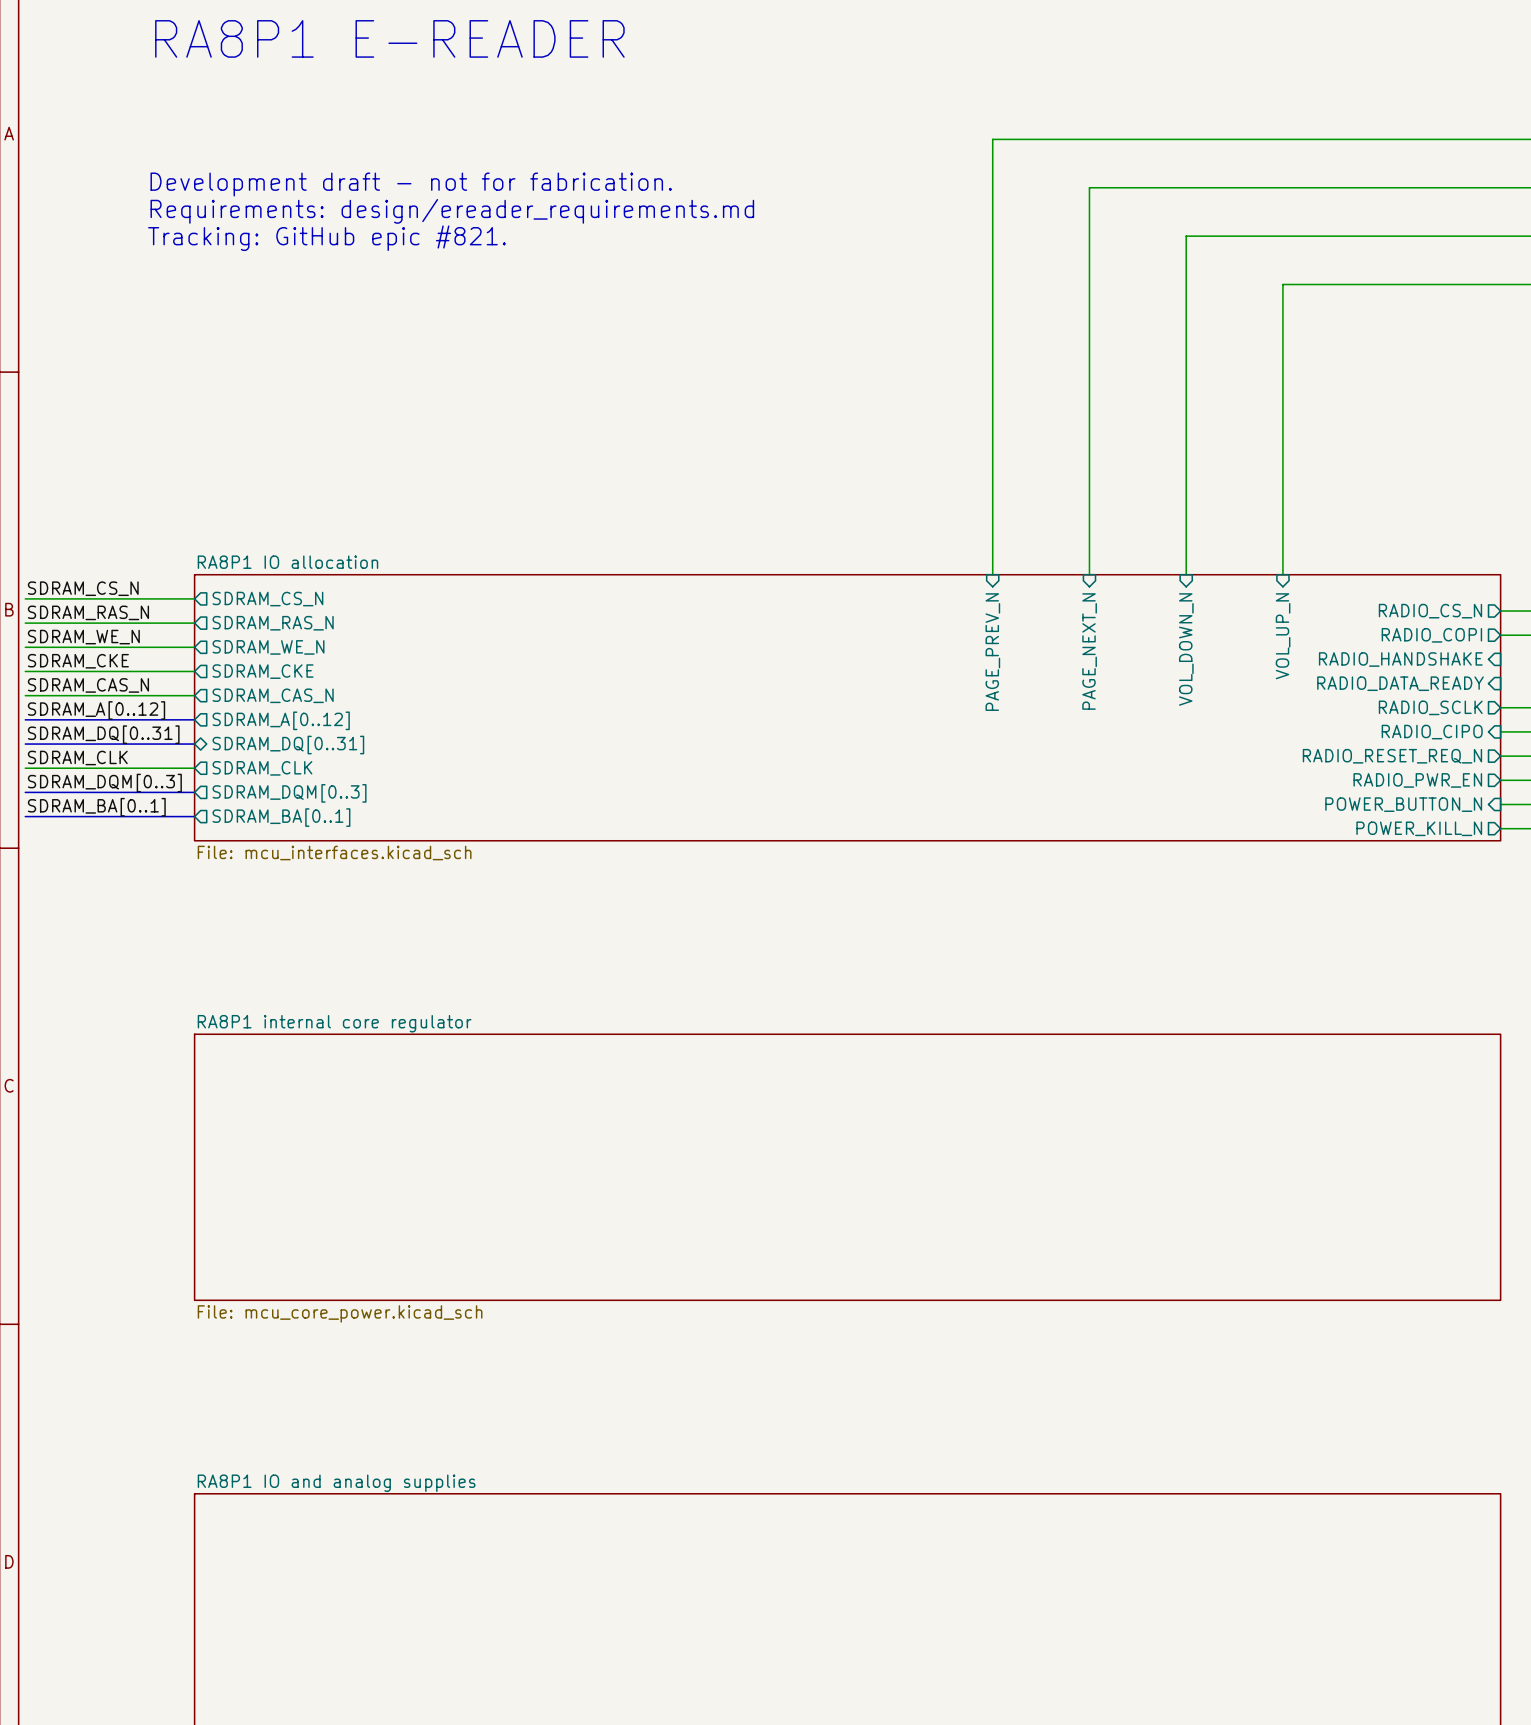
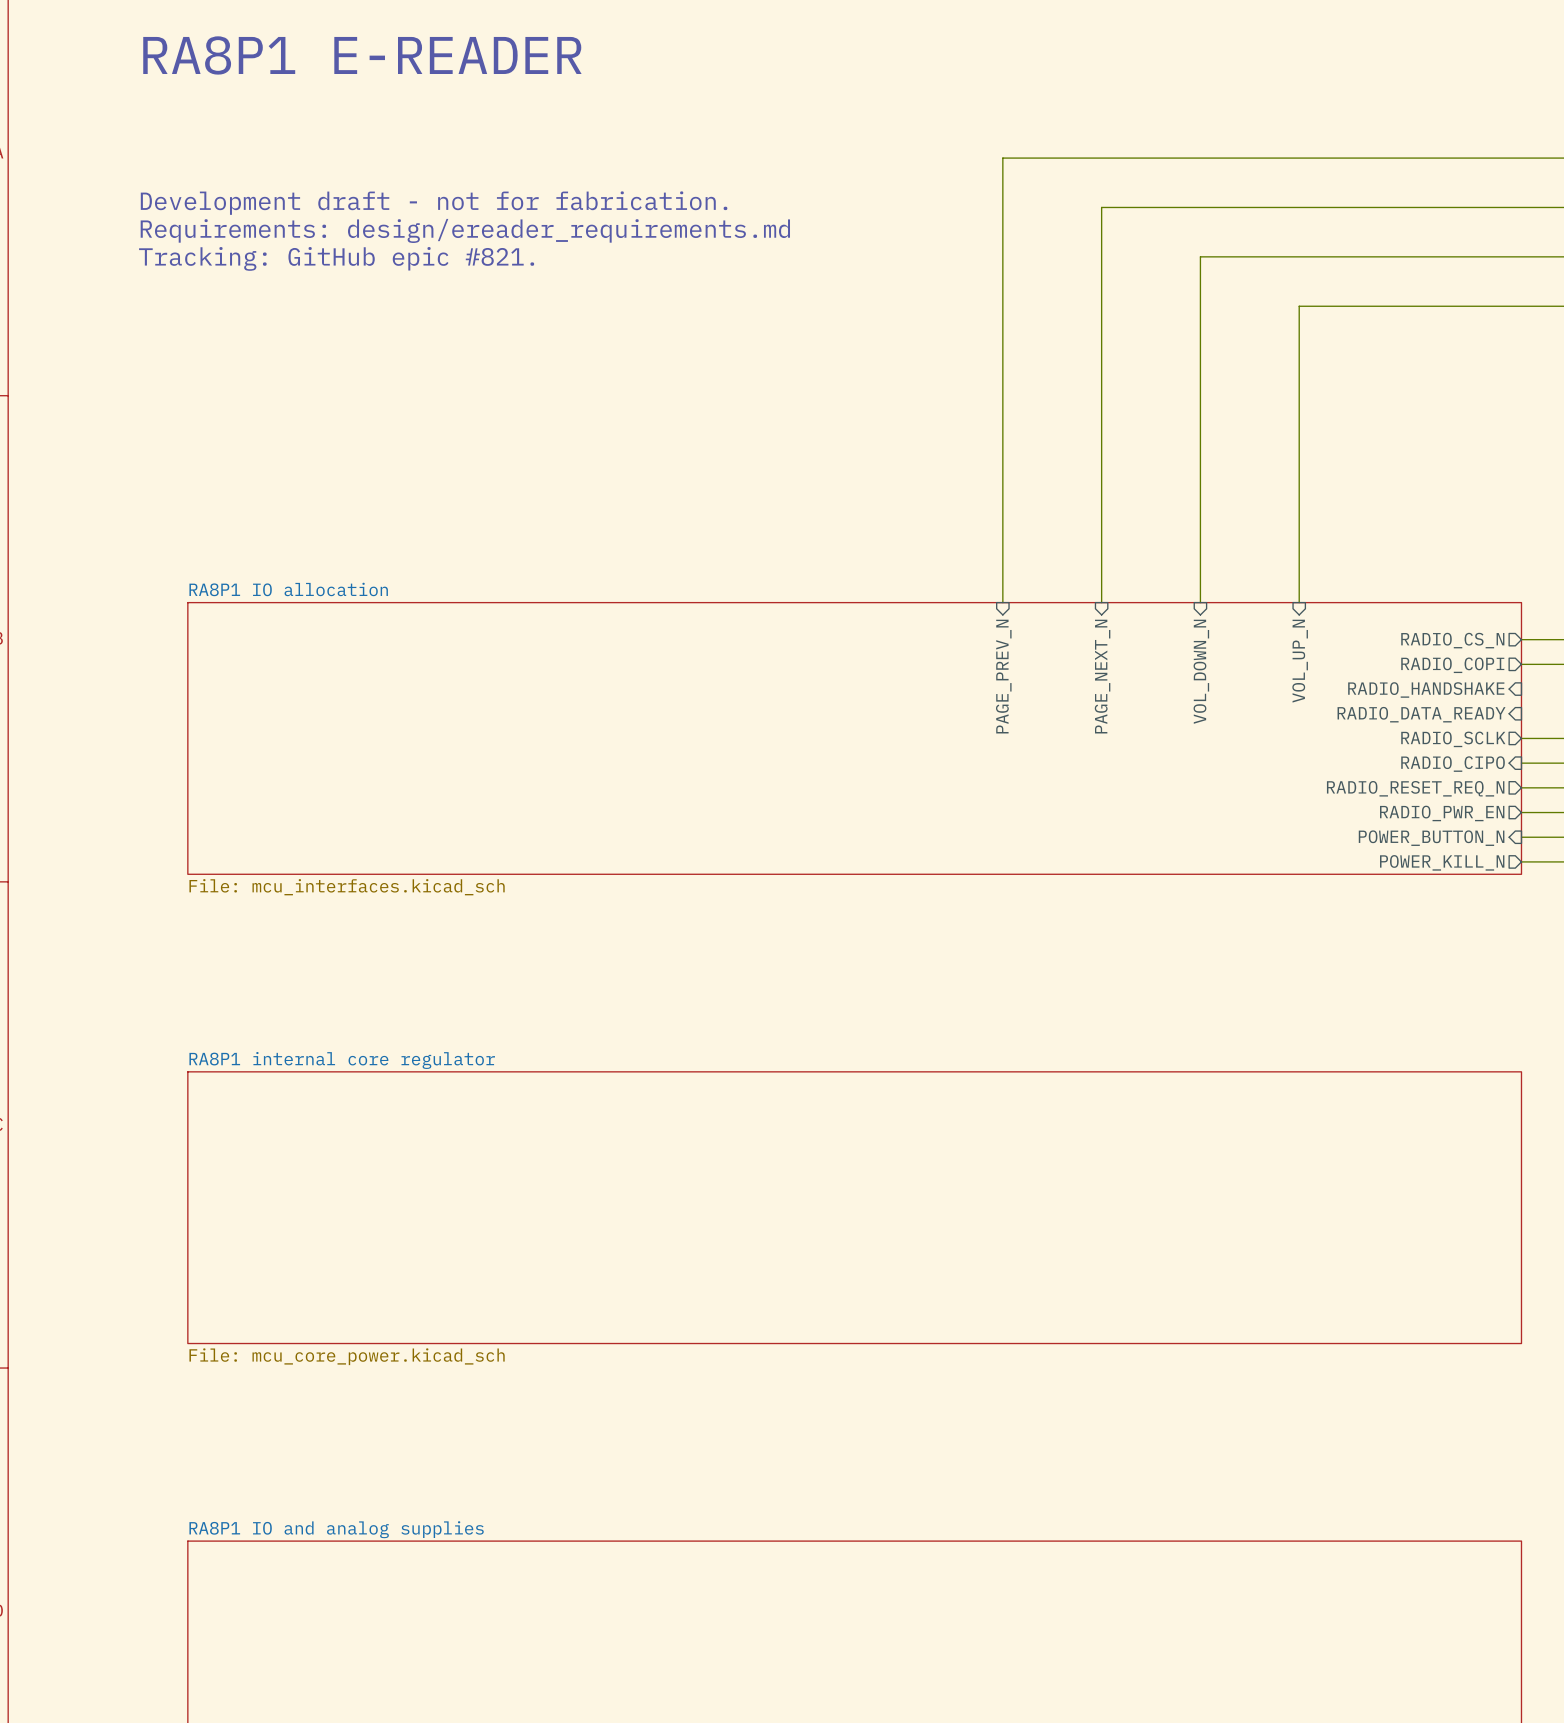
label: SDRAM_CS_N (83, 588) -> none
wire: (25, 598) (194, 598) -> none
sheet pin: SDRAM_CS_N (267, 599) -> none
label: SDRAM_RAS_N (88, 612) -> none
wire: (25, 623) (194, 623) -> none
sheet pin: SDRAM_RAS_N (273, 623) -> none
label: SDRAM_WE_N (83, 637) -> none
wire: (25, 647) (194, 647) -> none
sheet pin: SDRAM_WE_N (268, 647) -> none
label: SDRAM_CKE (78, 661) -> none
wire: (25, 671) (194, 671) -> none
sheet pin: SDRAM_CKE (263, 671) -> none
label: SDRAM_CAS_N (88, 685) -> none
wire: (25, 695) (194, 695) -> none
sheet pin: SDRAM_CAS_N (273, 695) -> none
label: SDRAM_A[0..12] (96, 710) -> none
bus: (25, 719) (194, 719) -> none
sheet pin: SDRAM_A[0..12] (281, 720) -> none
label: SDRAM_DQ[0..31] (103, 734) -> none
bus: (25, 744) (194, 744) -> none
sheet pin: SDRAM_DQ[0..31] (288, 745) -> none
label: SDRAM_CLK (77, 758) -> none
wire: (25, 768) (194, 768) -> none
sheet pin: SDRAM_CLK (262, 768) -> none
label: SDRAM_DQM[0..3] (104, 783) -> none
bus: (25, 792) (194, 792) -> none
sheet pin: SDRAM_DQM[0..3] (289, 793) -> none
label: SDRAM_BA[0..1] (96, 807) -> none
bus: (25, 816) (194, 816) -> none
sheet pin: SDRAM_BA[0..1] (281, 817) -> none

